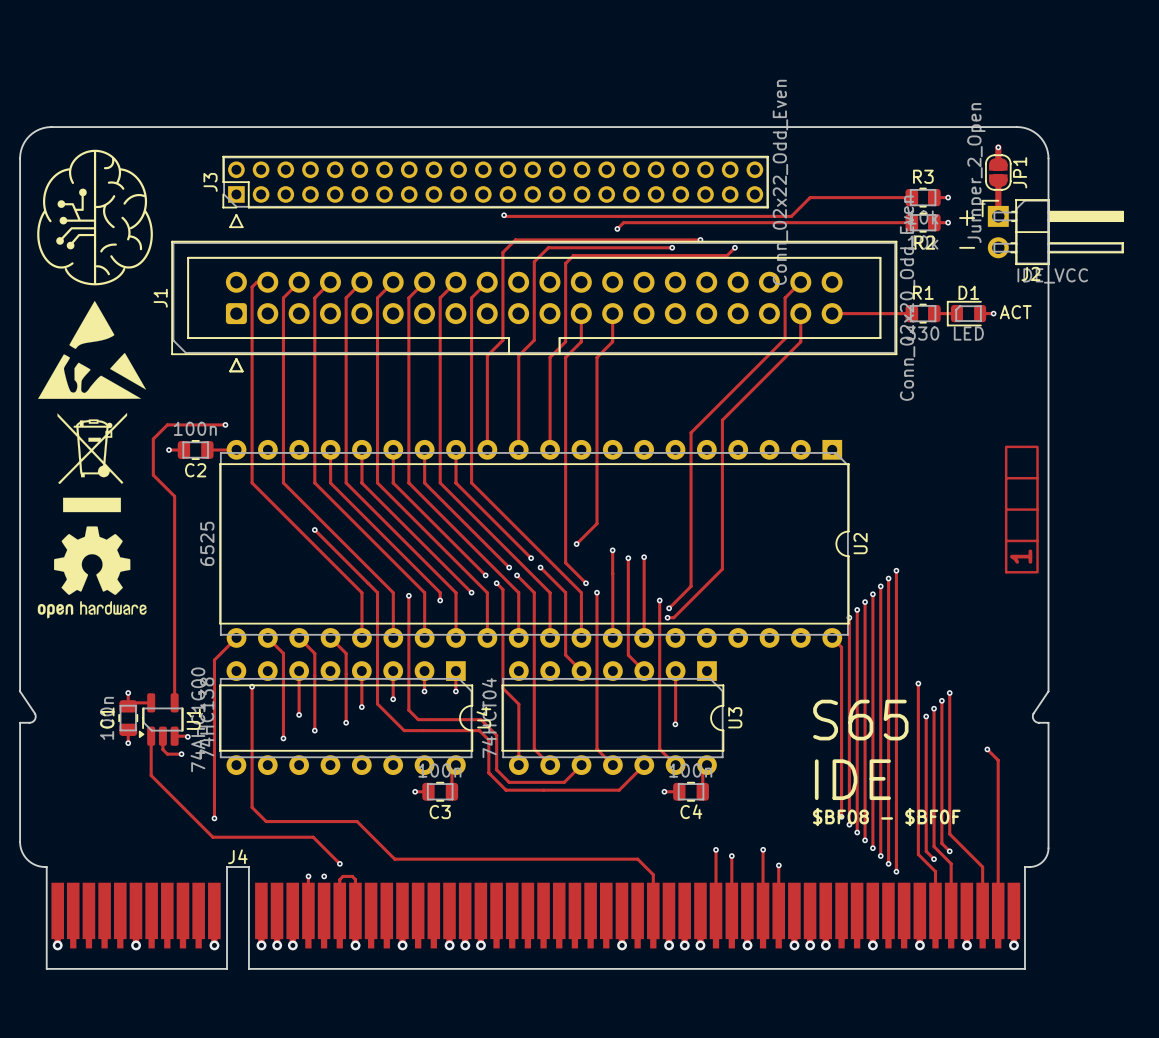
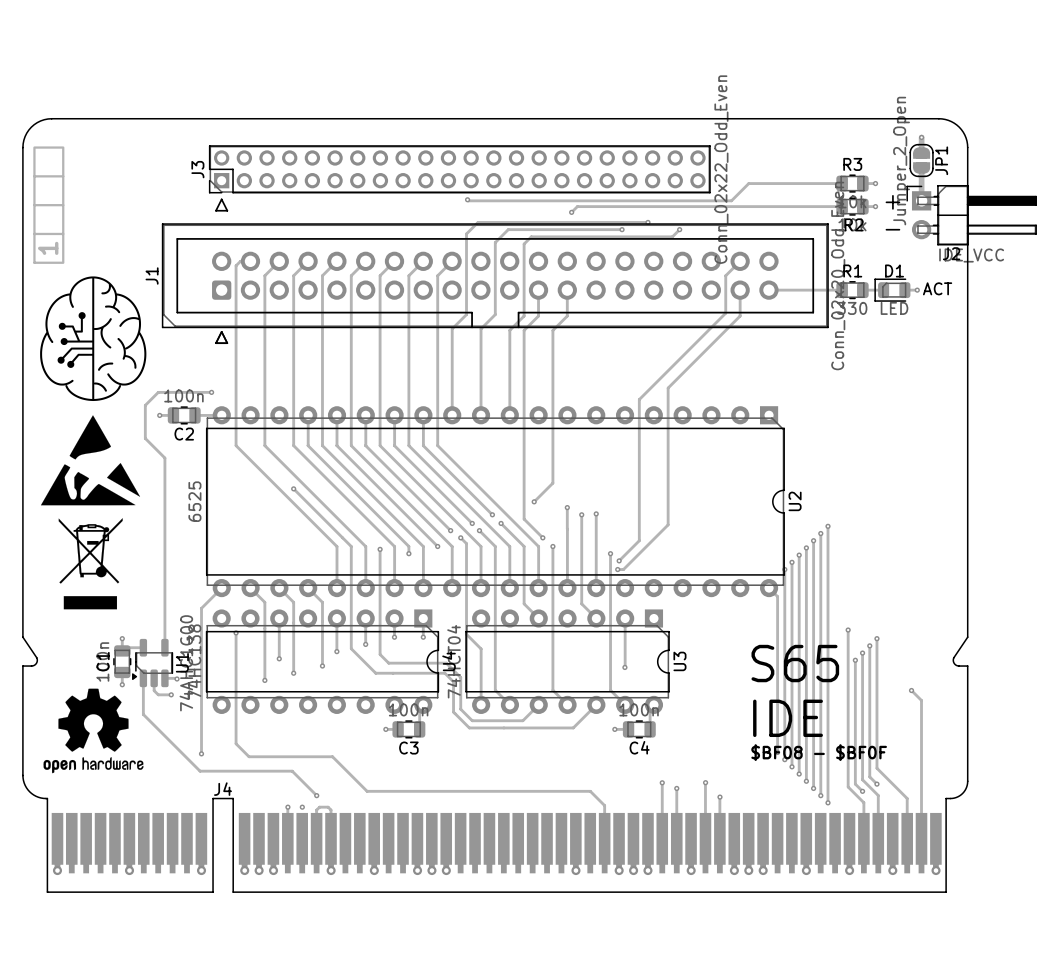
drawing: none -> [33, 146, 65, 264]
drawing position: (95, 217) -> (93, 338)
drawing position: (92, 349) -> (90, 460)
drawing: [1004, 445, 1039, 574] -> none
drawing position: (92, 462) -> (90, 563)
drawing position: (92, 572) -> (93, 730)

